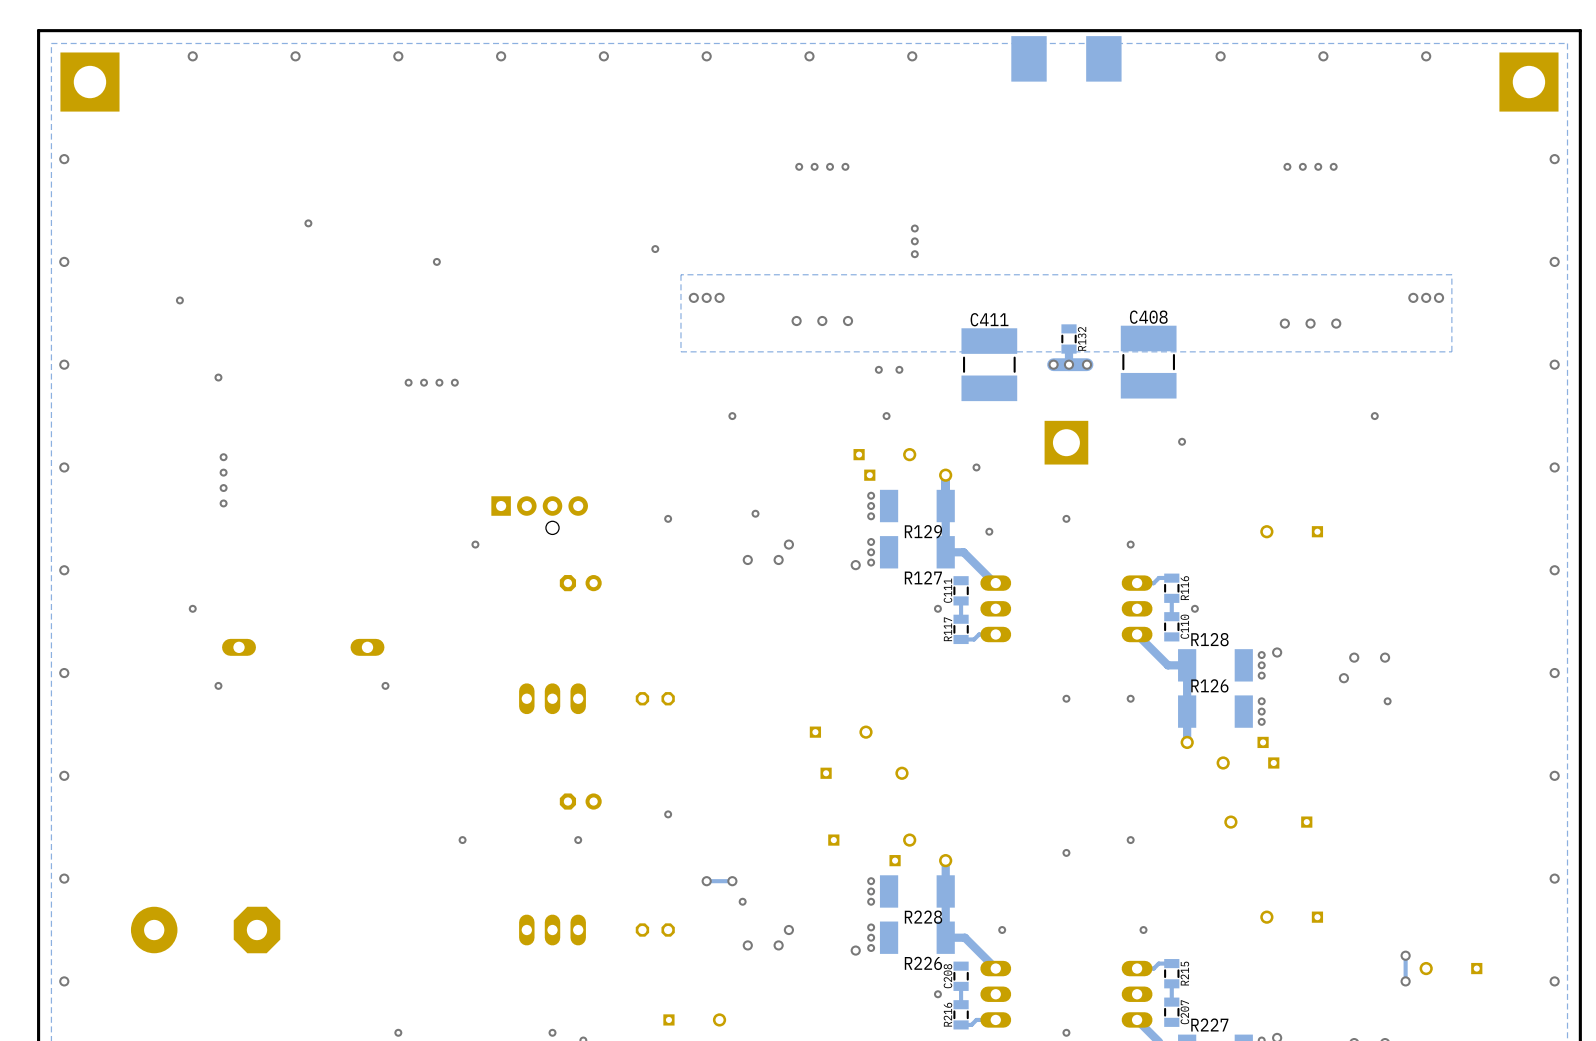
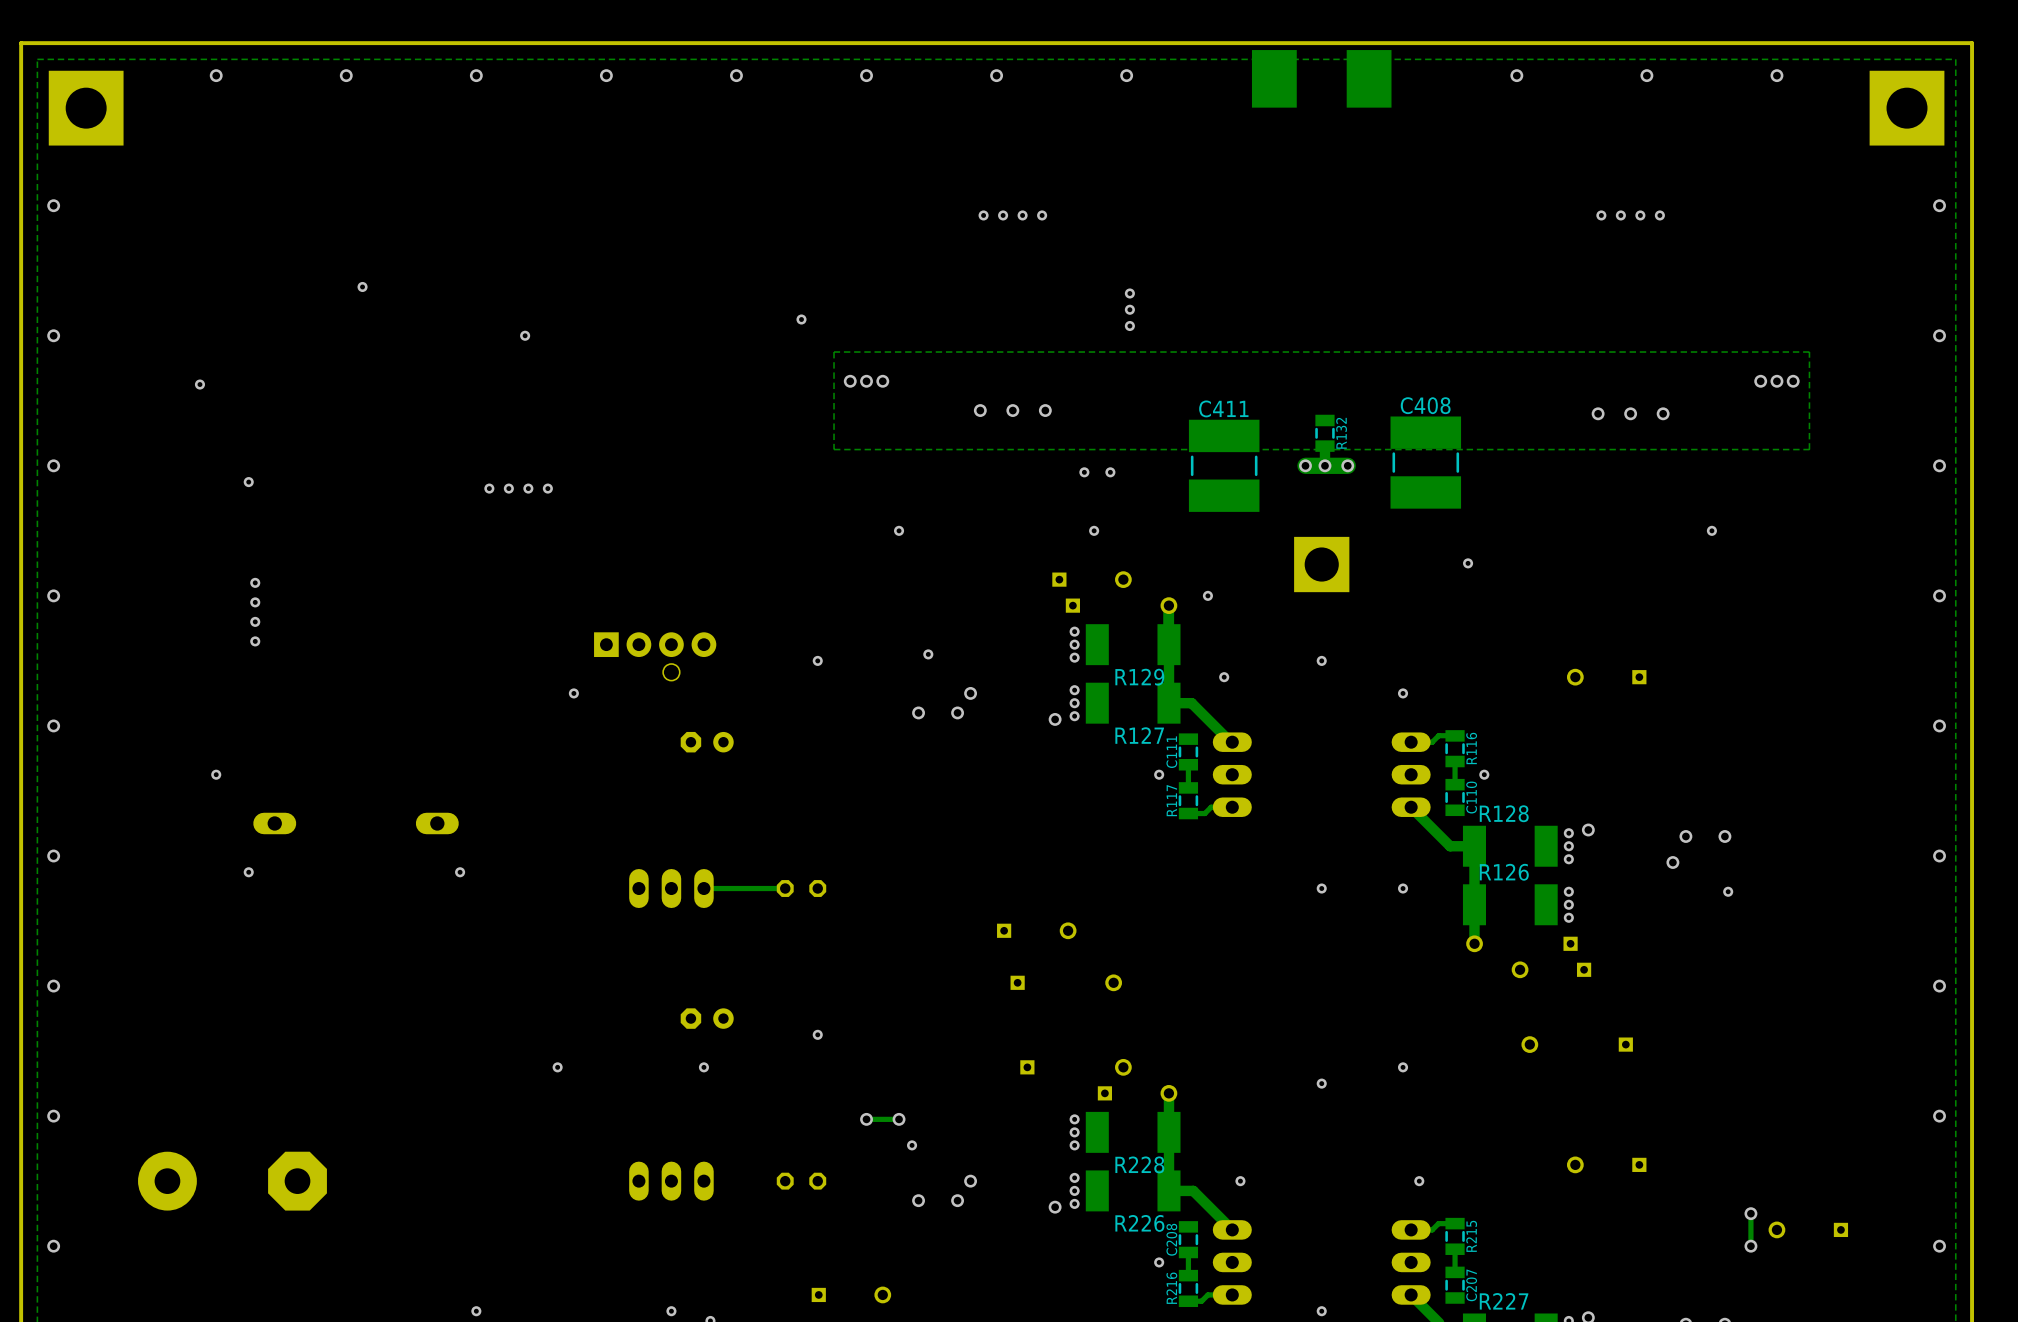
track: none -> (785, 888) (703, 888)

